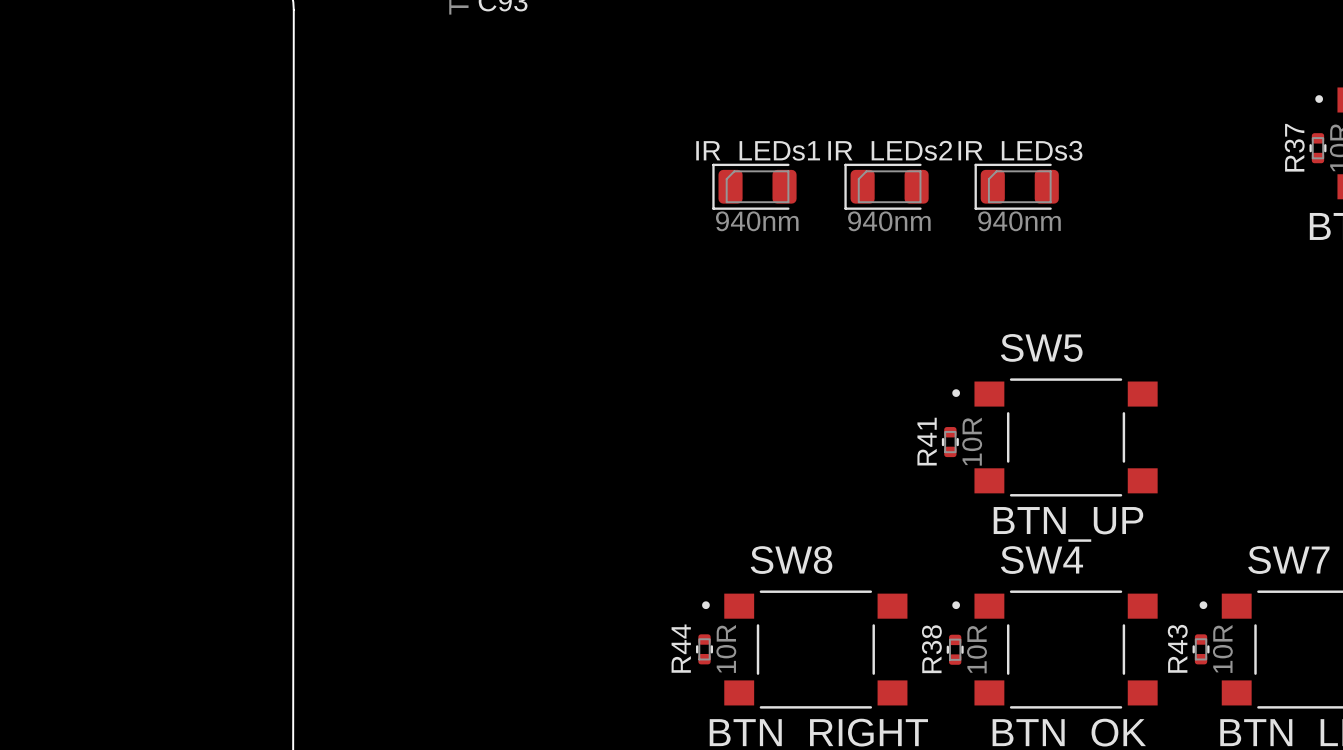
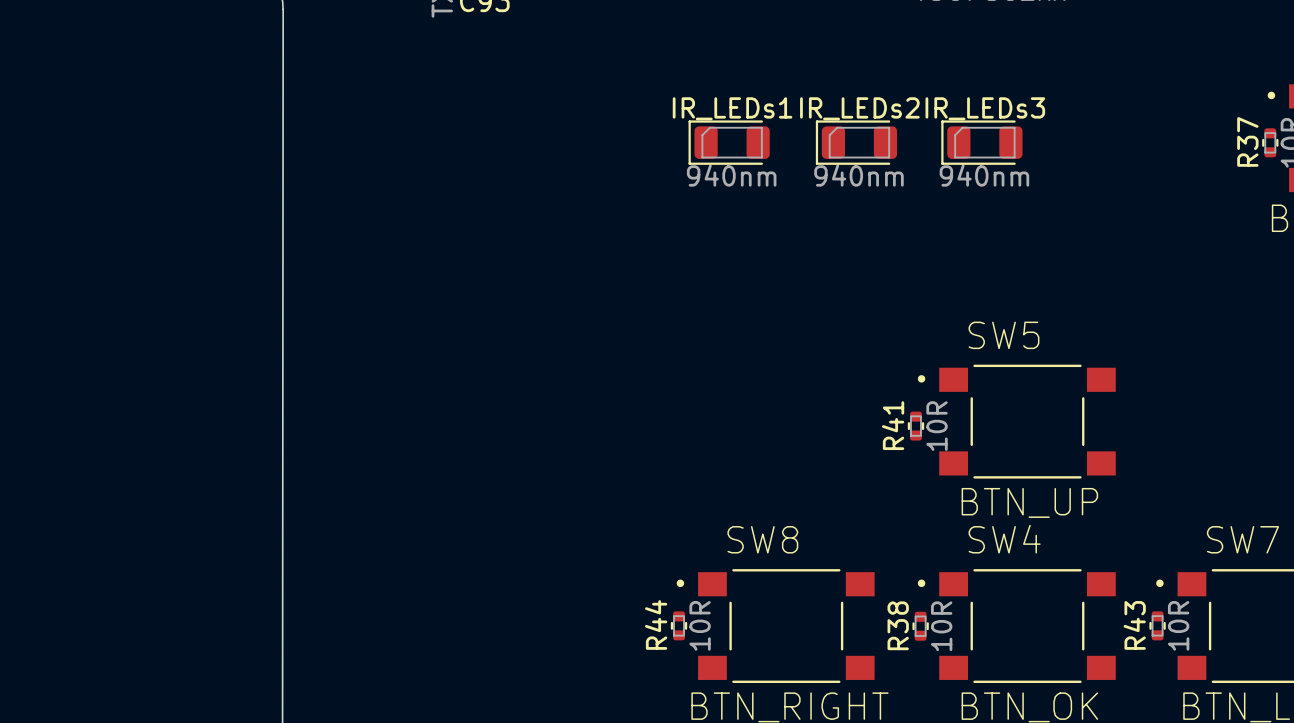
IR_LEDs1 position: (754, 186) -> (729, 142)
IR_LEDs2 position: (886, 186) -> (856, 142)
IR_LEDs3 position: (1016, 186) -> (981, 142)

